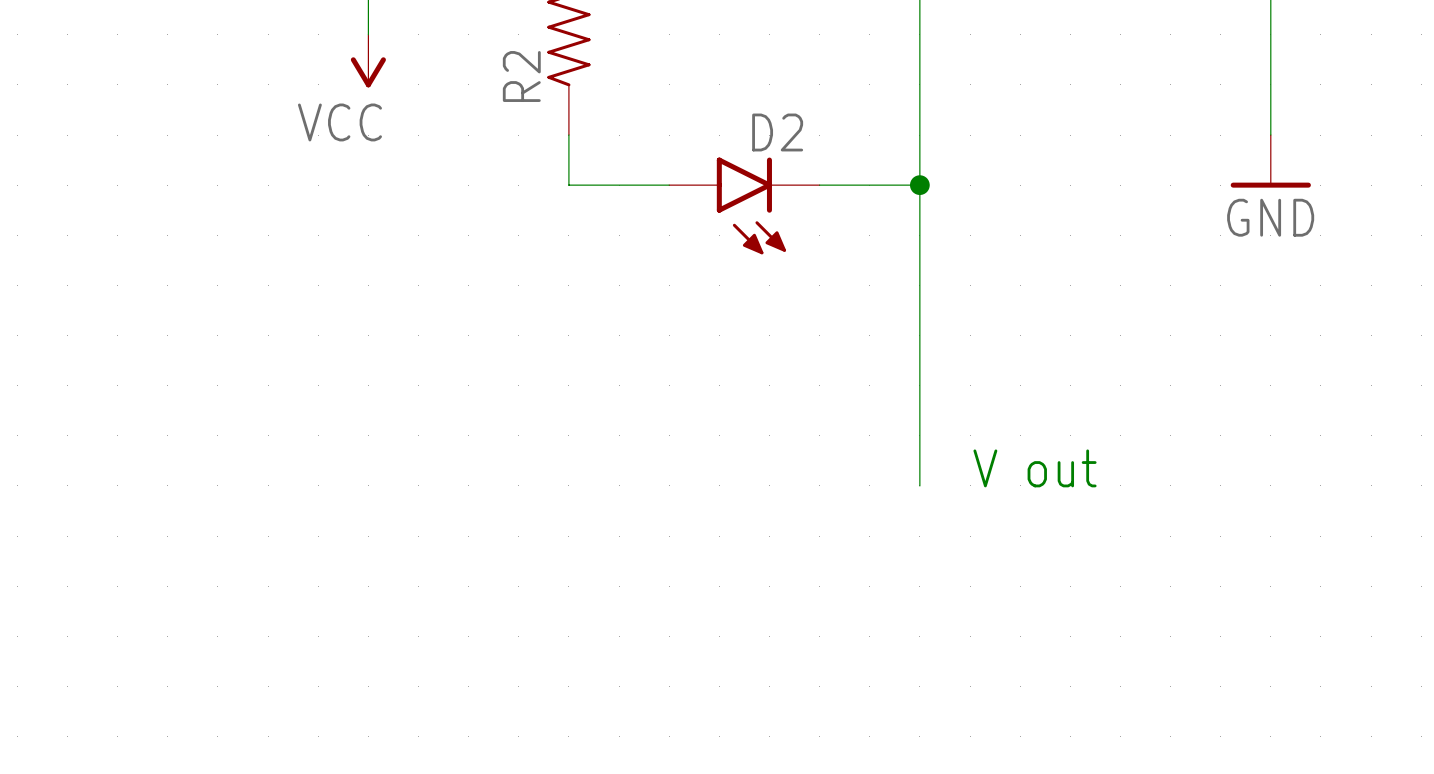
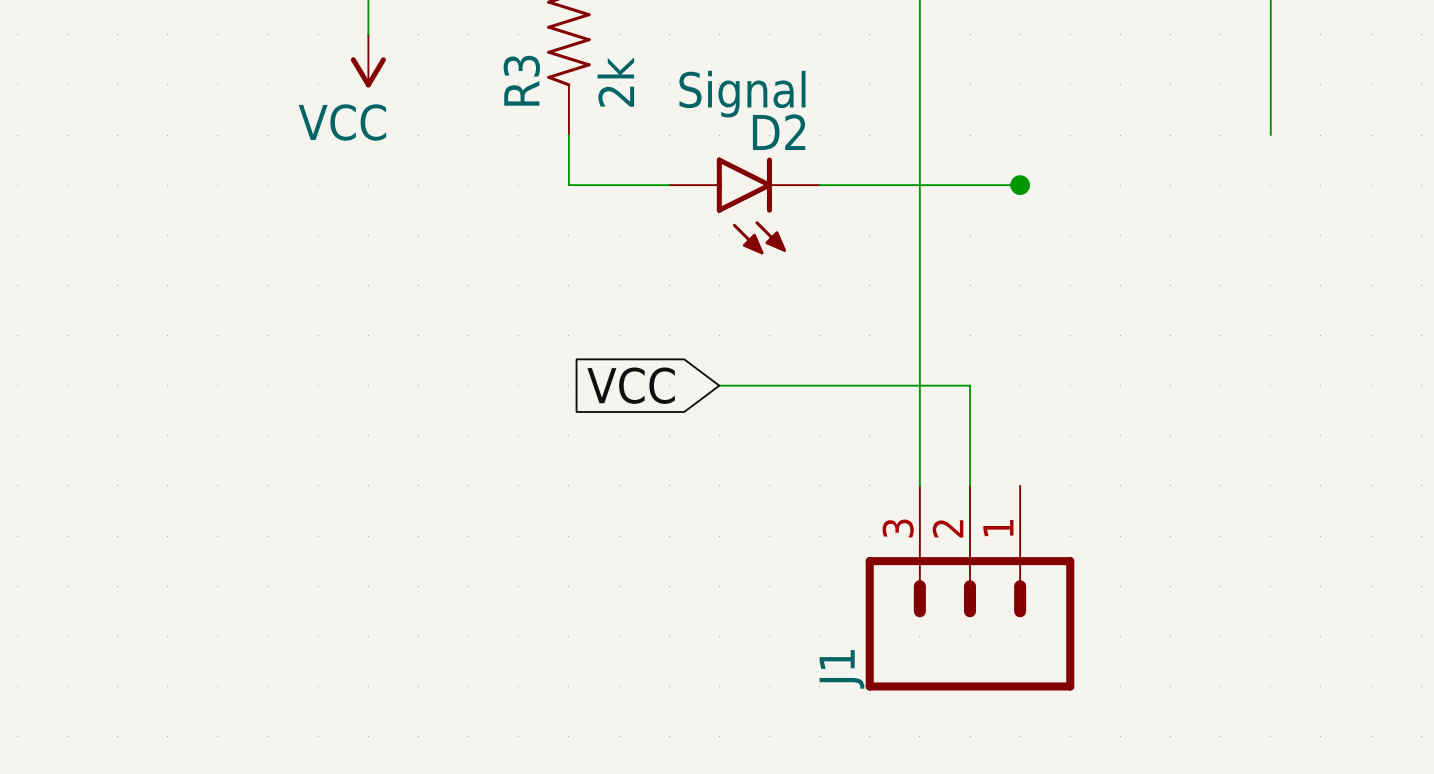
R2 name: R2 (521, 76) -> R3 (521, 80)
R2 value: none -> 2k (615, 82)
D2 value: none -> Signal (742, 94)
power symbol: GND (1270, 161) -> none
wire: none -> (919, 185) (1020, 185)
junction position: (919, 185) -> (1020, 185)
global label: none -> VCC (631, 385)
wire: none -> (719, 385) (970, 385) (970, 485)
text: V out (1035, 468) -> none
J1: none -> (970, 588)

